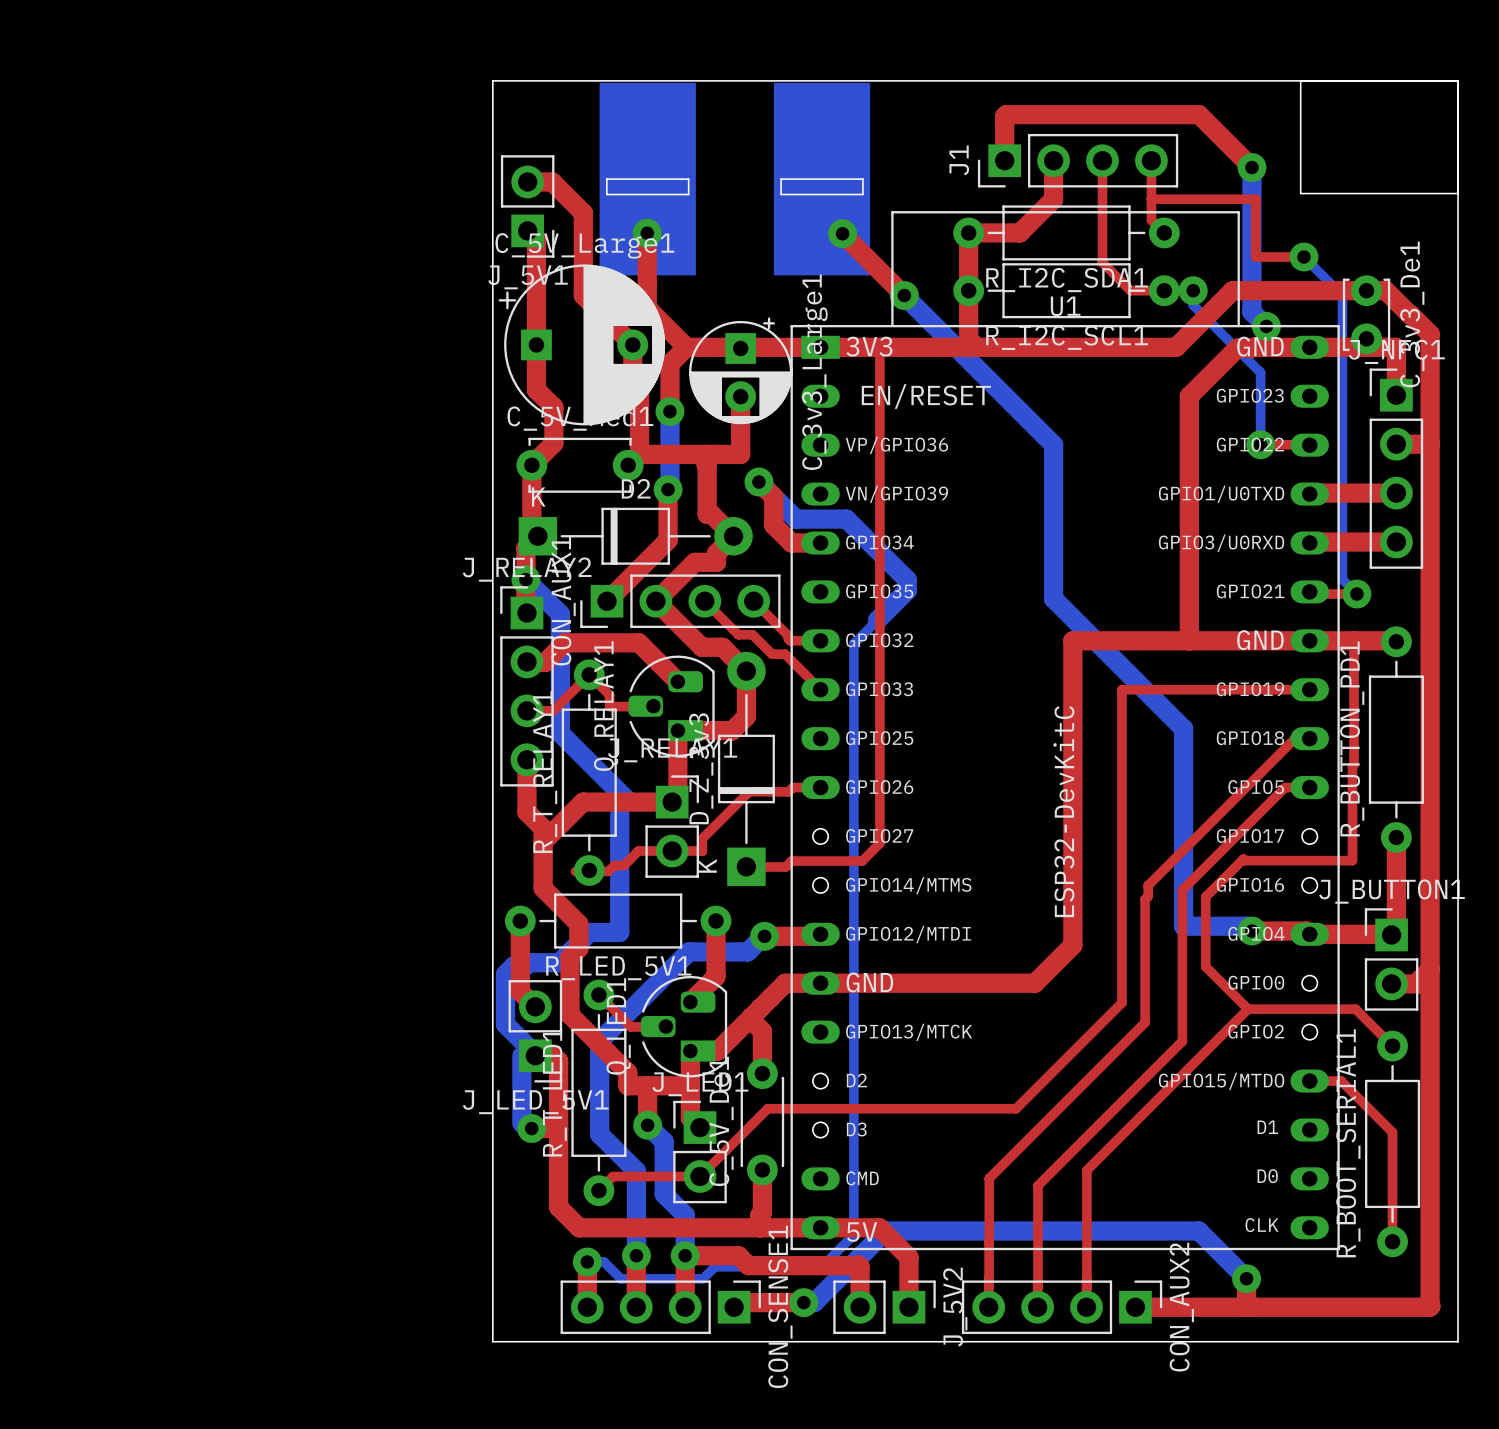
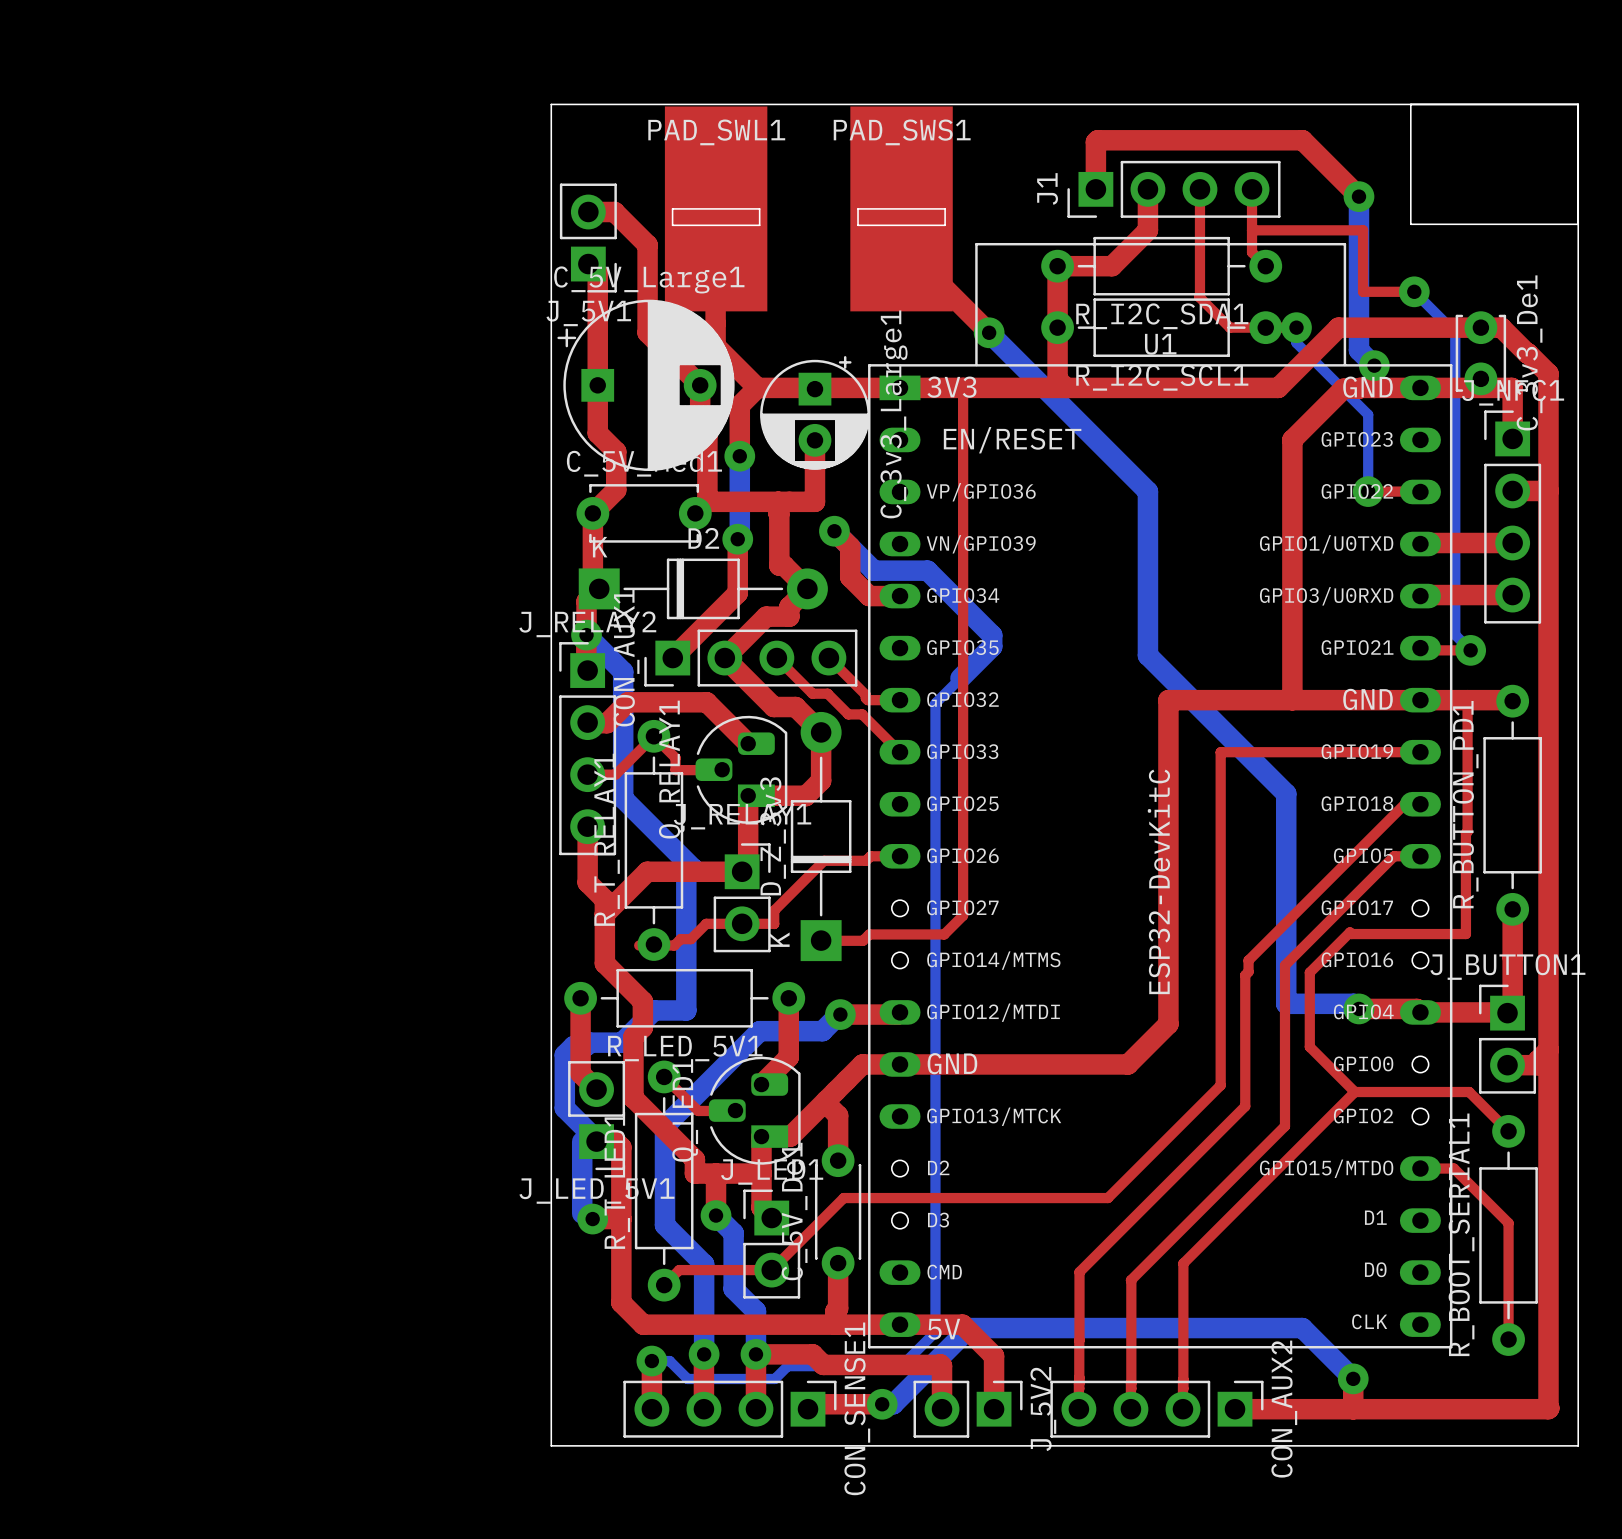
PAD_SWL1 side: bottom (647, 179) -> top (716, 208)
PAD_SWS1 side: bottom (822, 179) -> top (901, 208)
via: (647, 233) -> none
via: (842, 233) -> none

